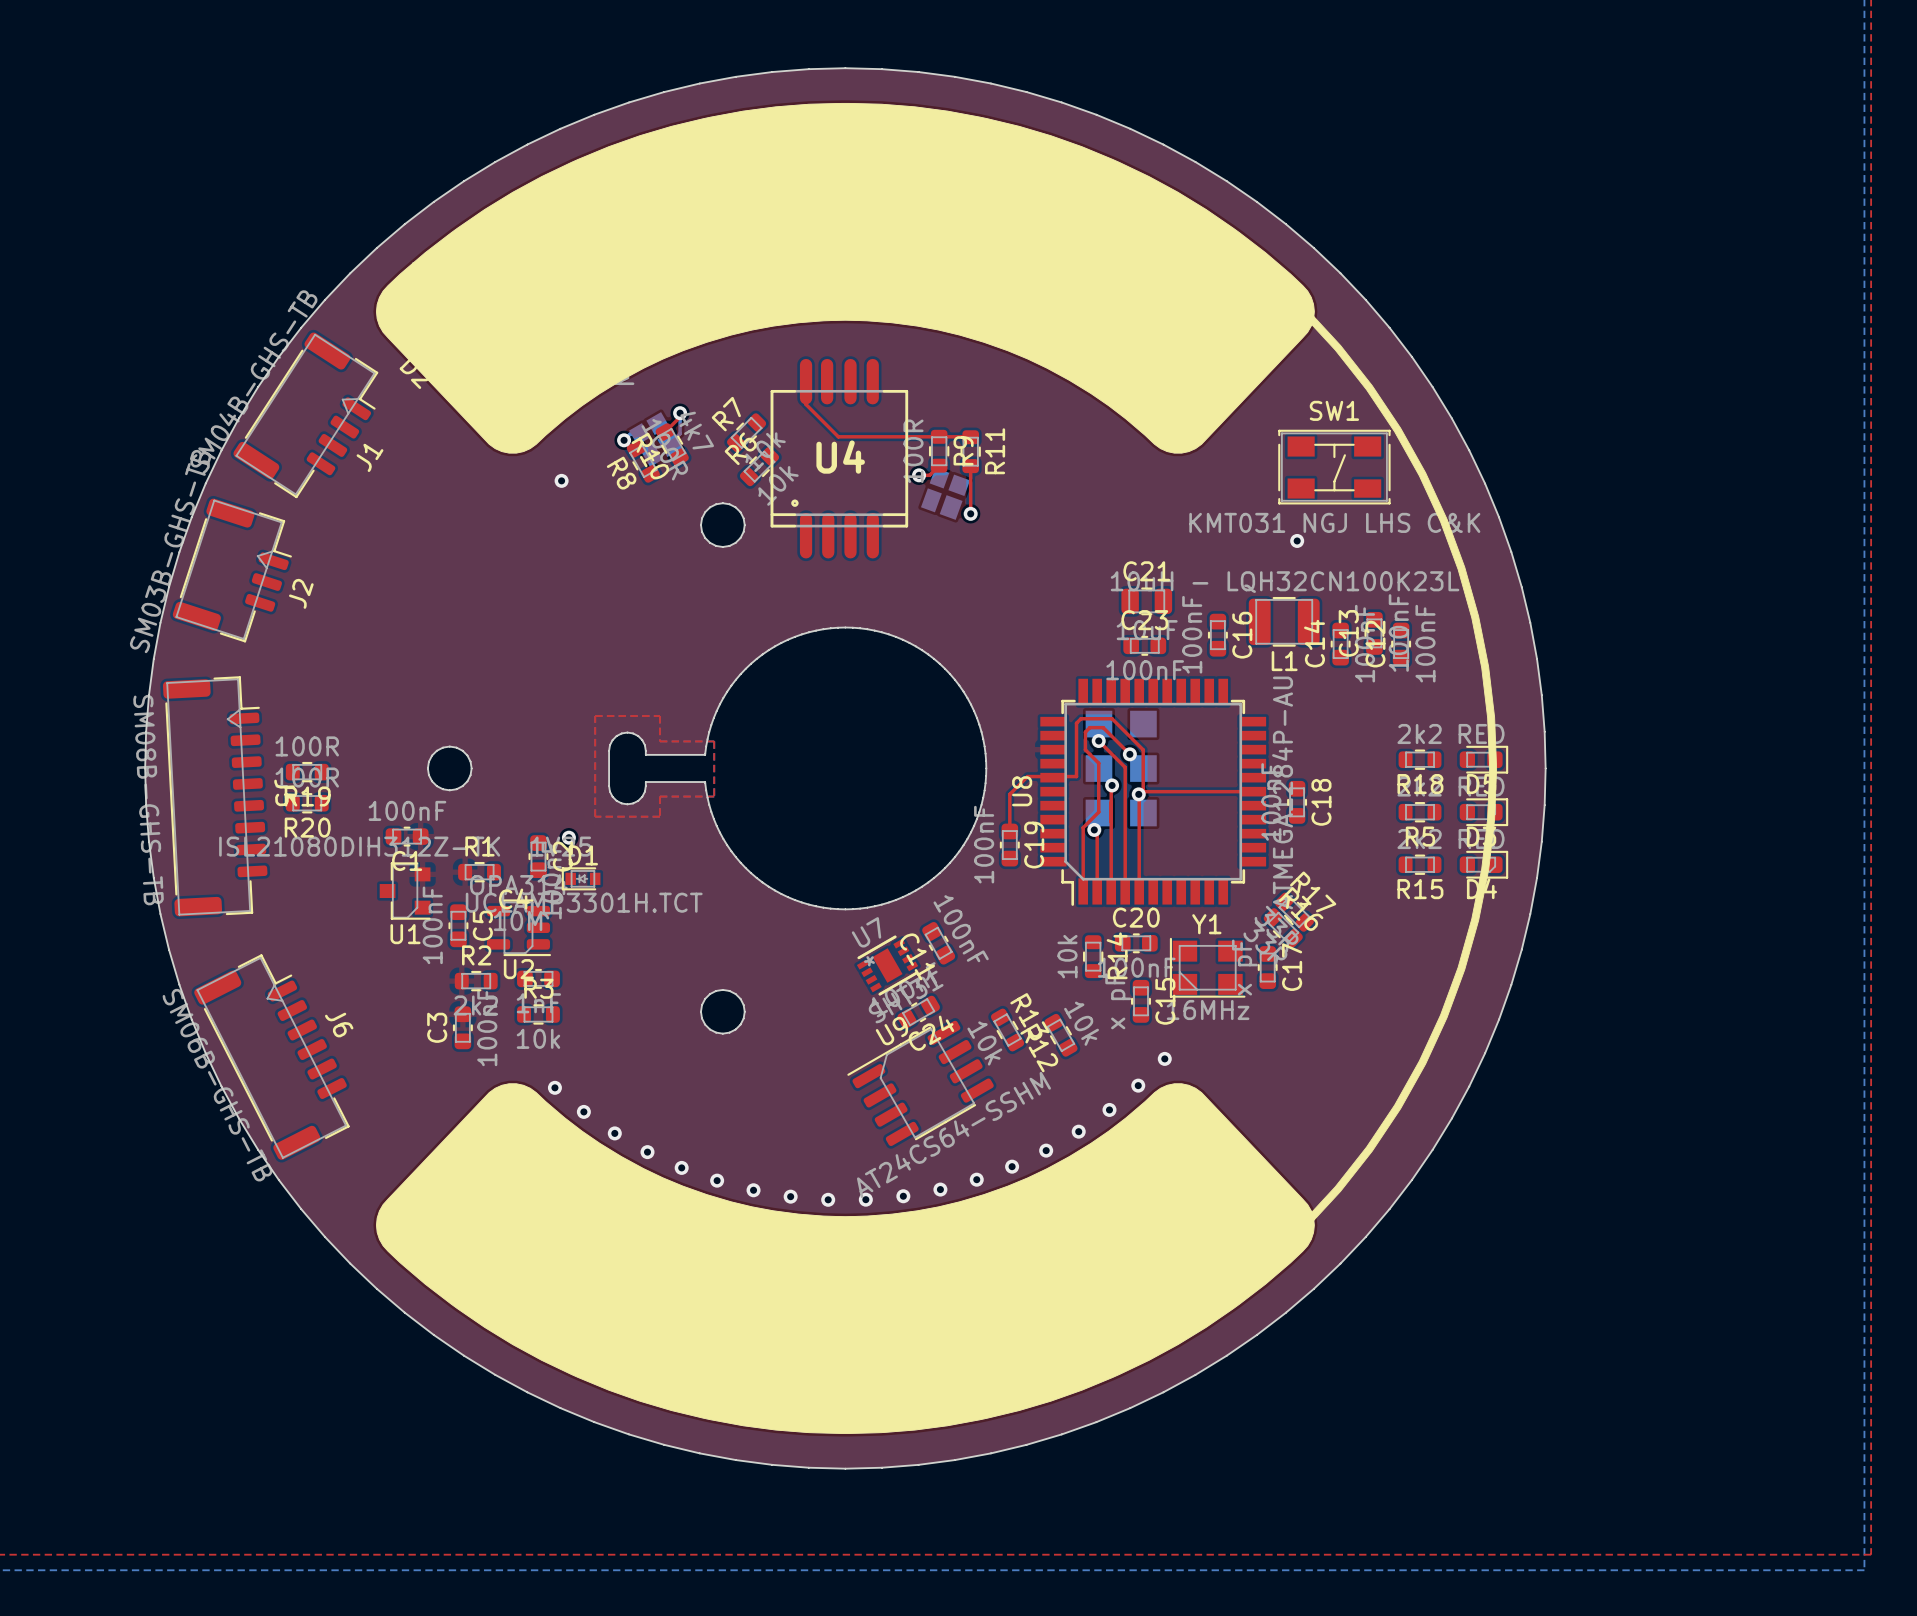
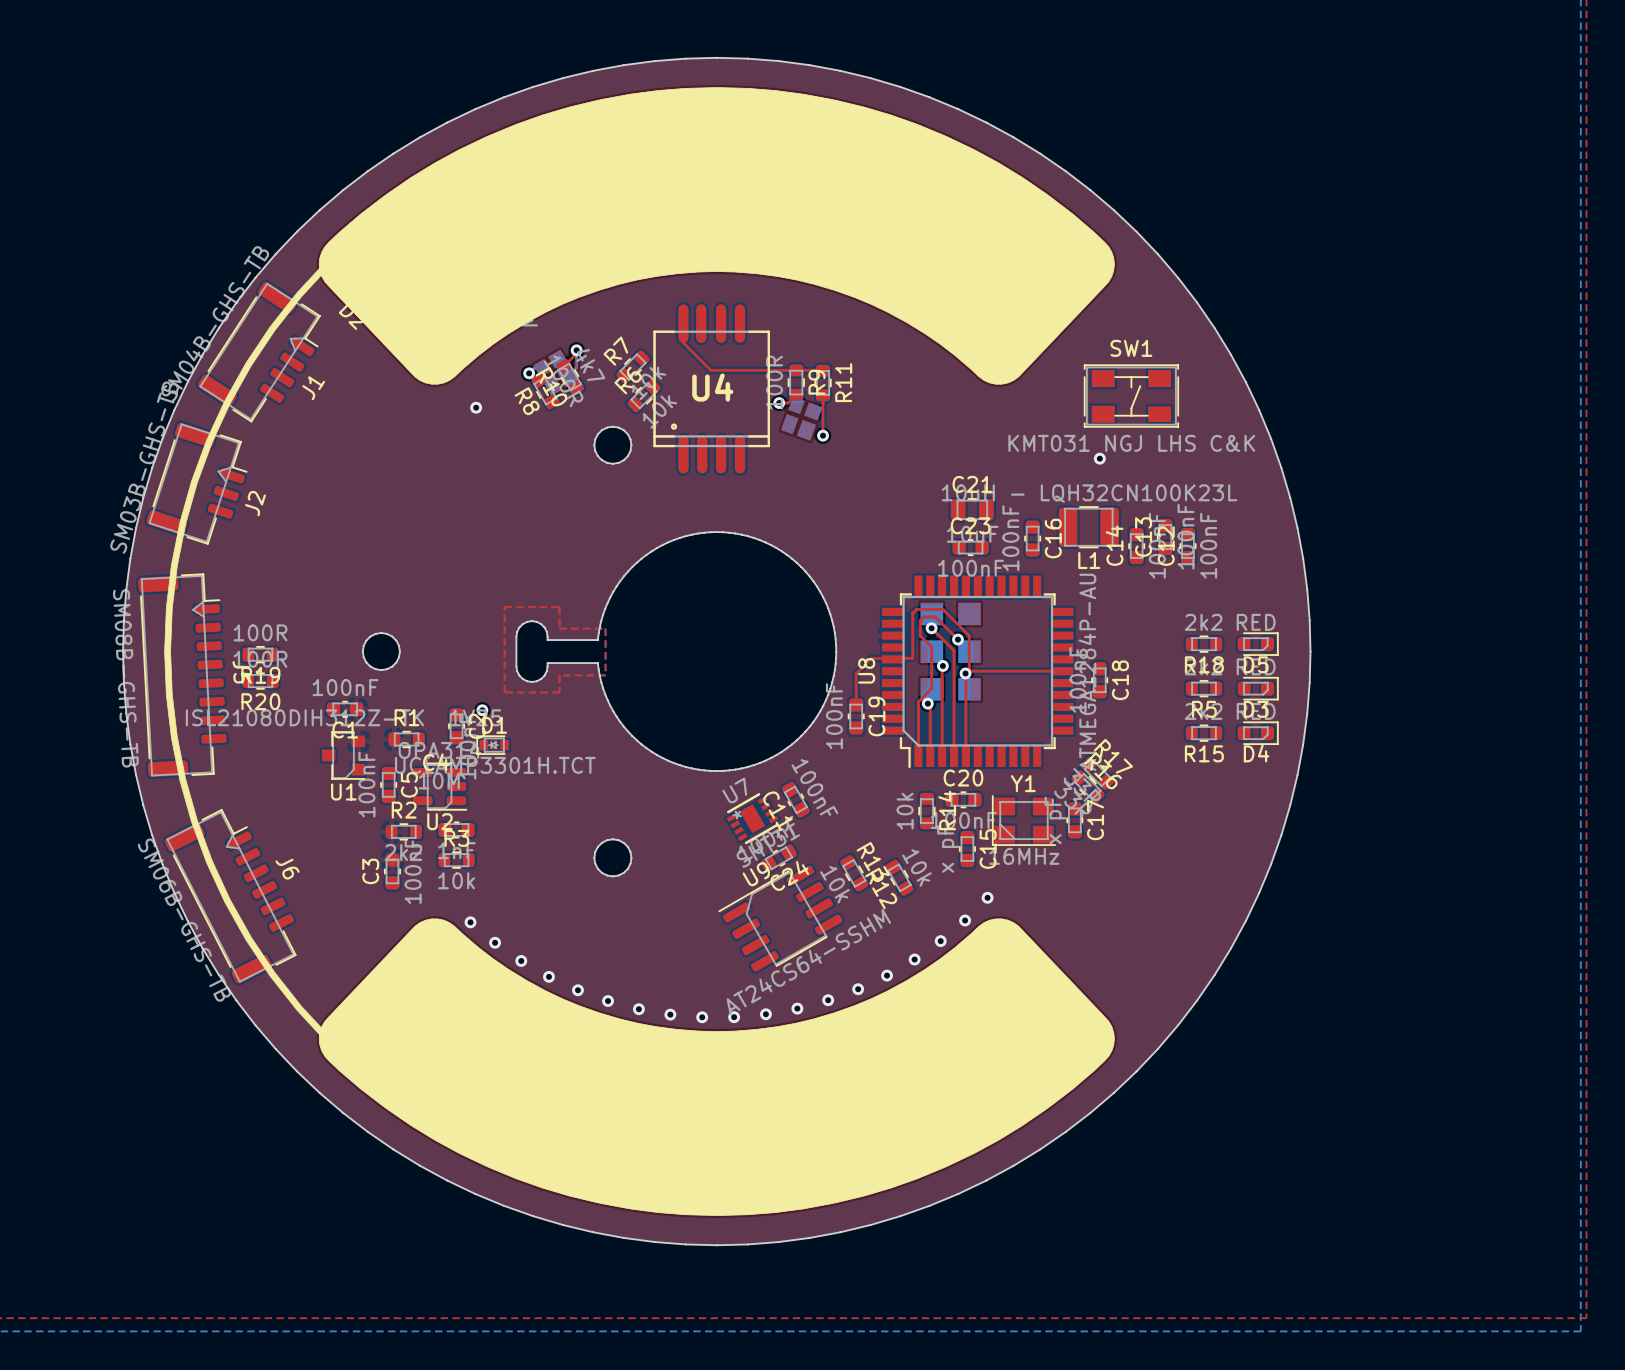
drawing: none -> [164, 228, 367, 1075]
drawing: [1258, 269, 1498, 1268] -> none

